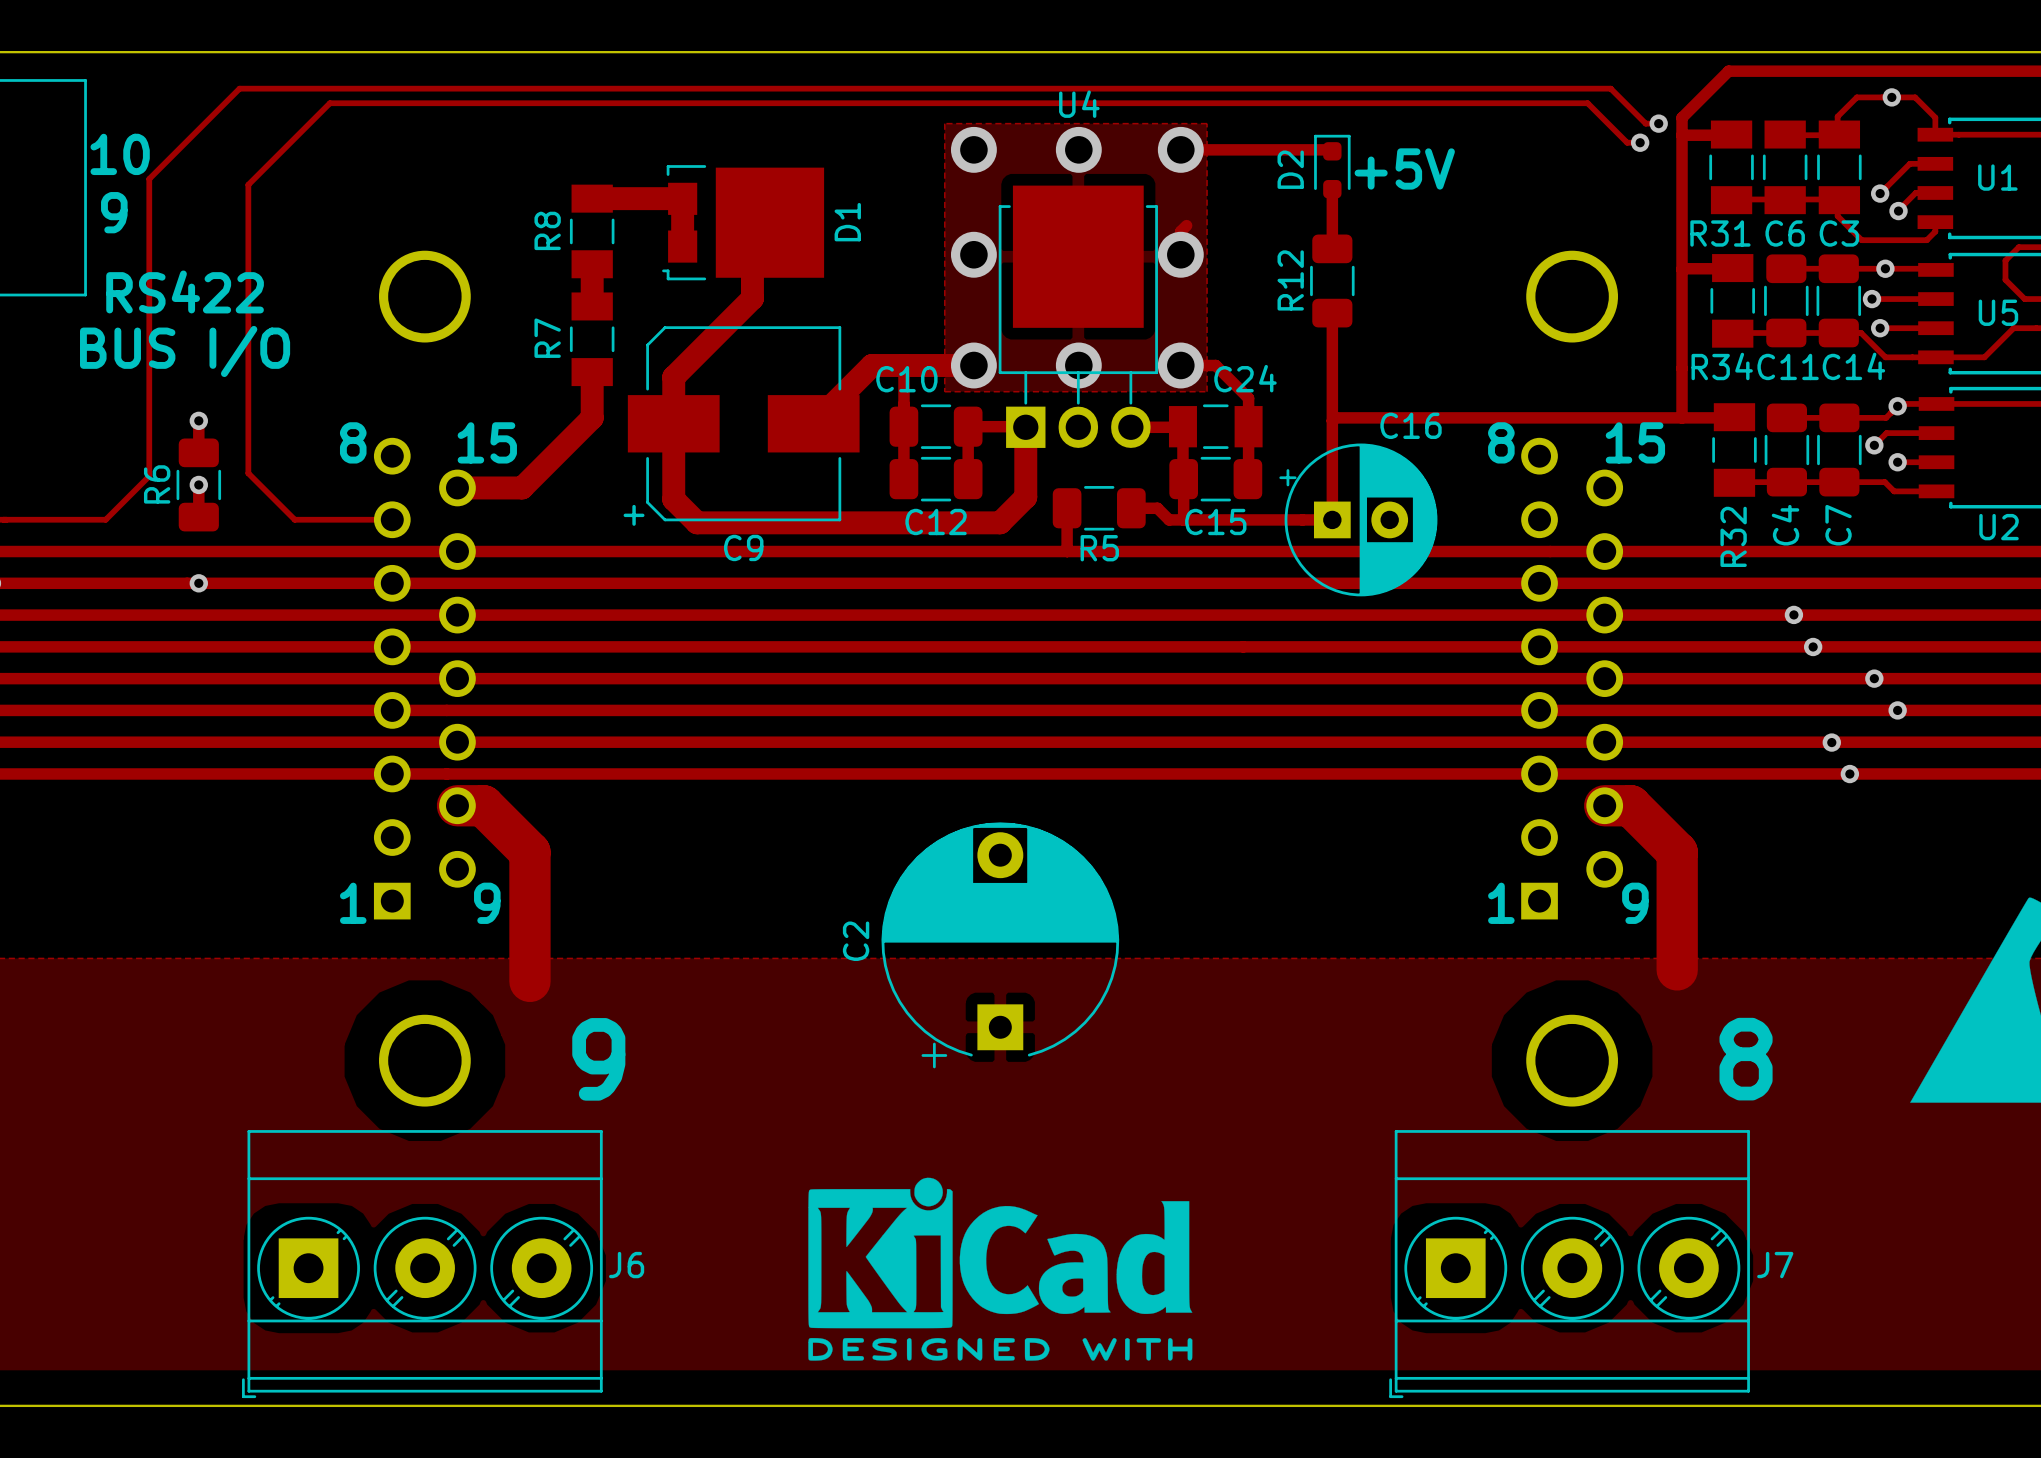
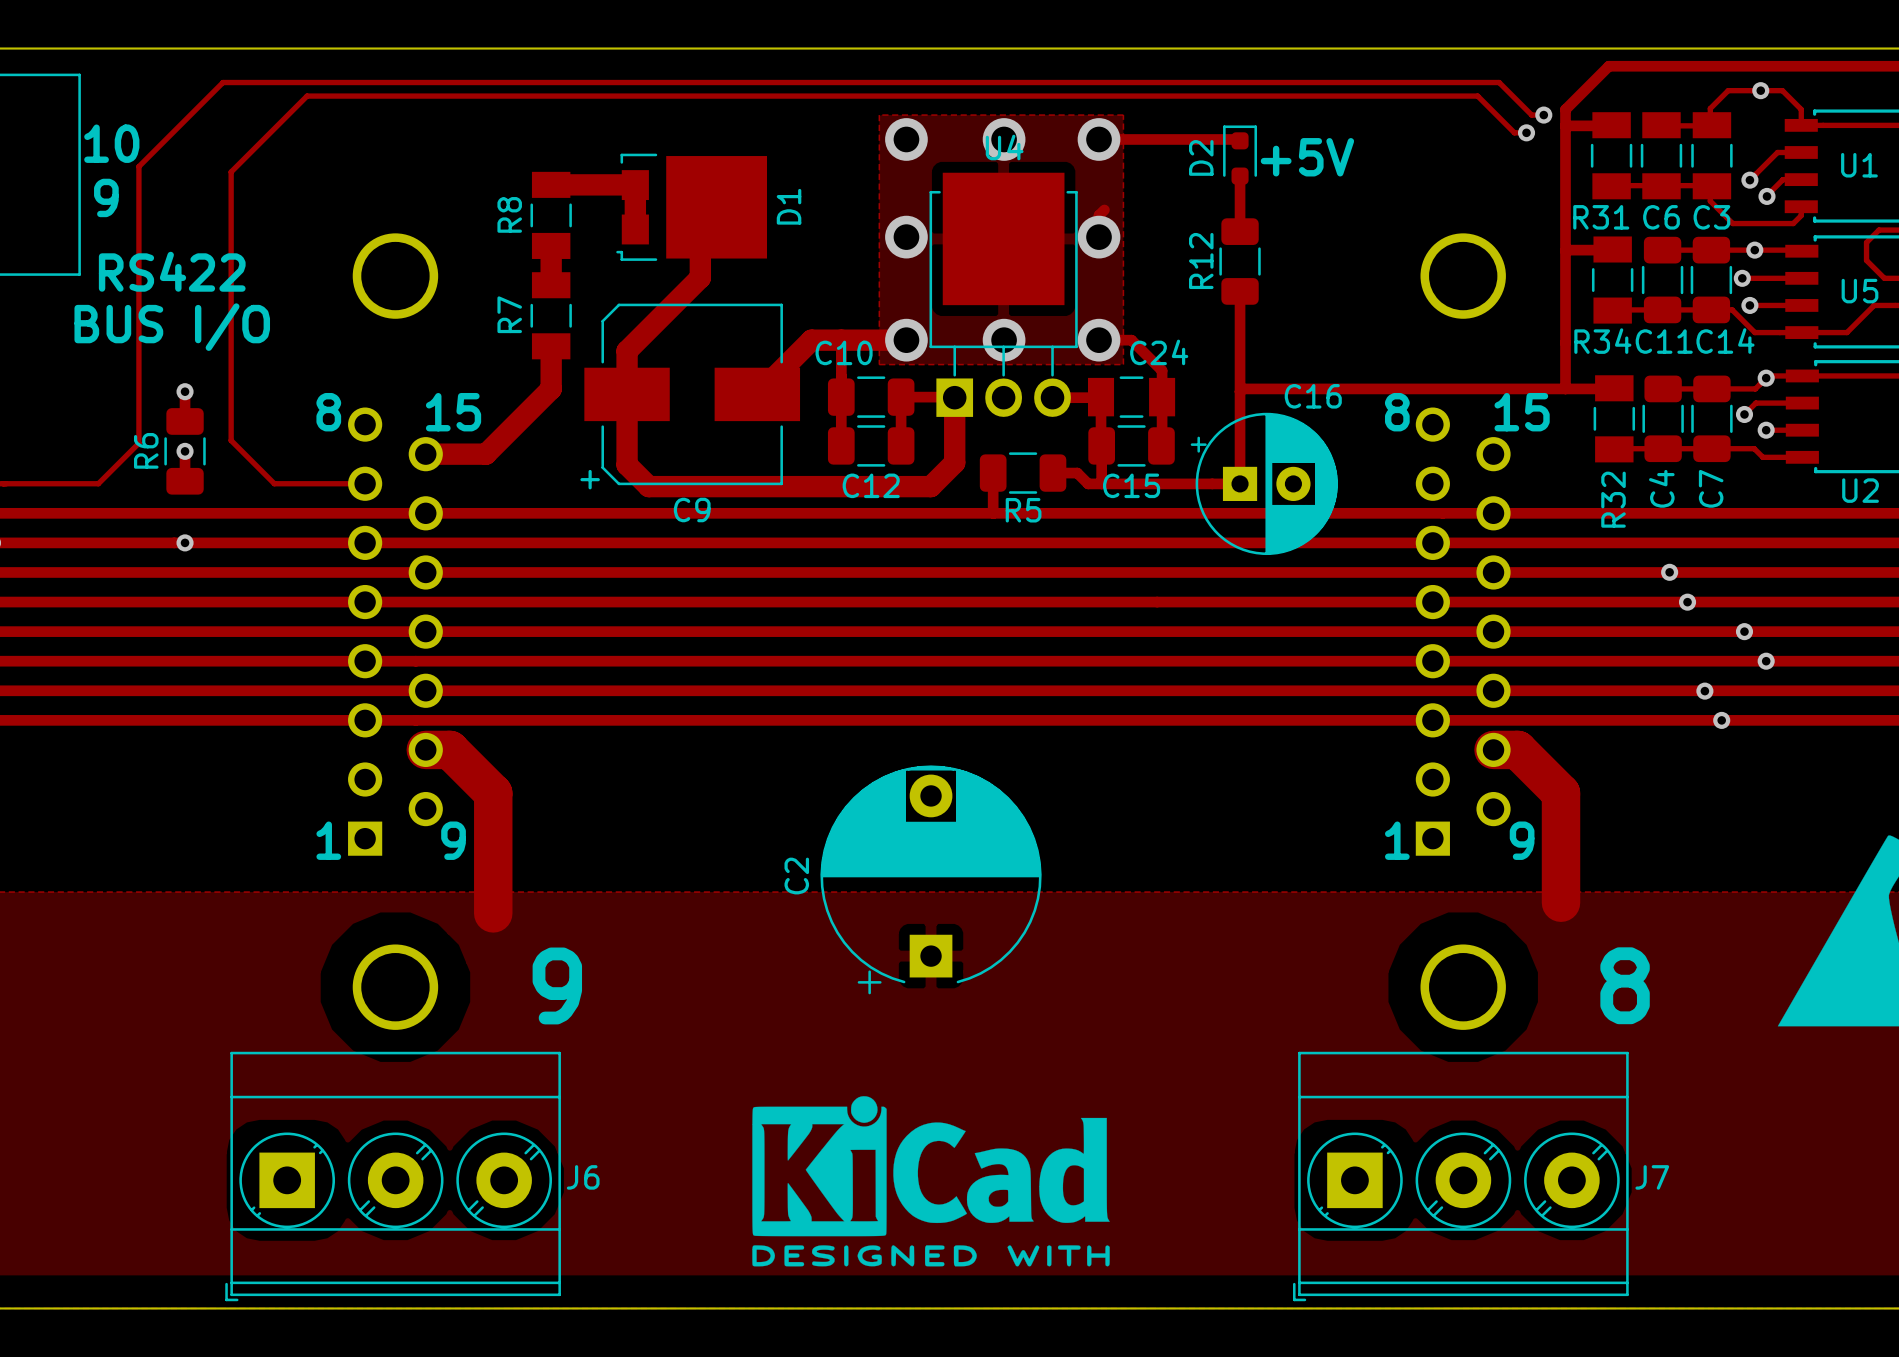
U4 name position: U4 (1079, 104) -> U4 (1004, 147)

